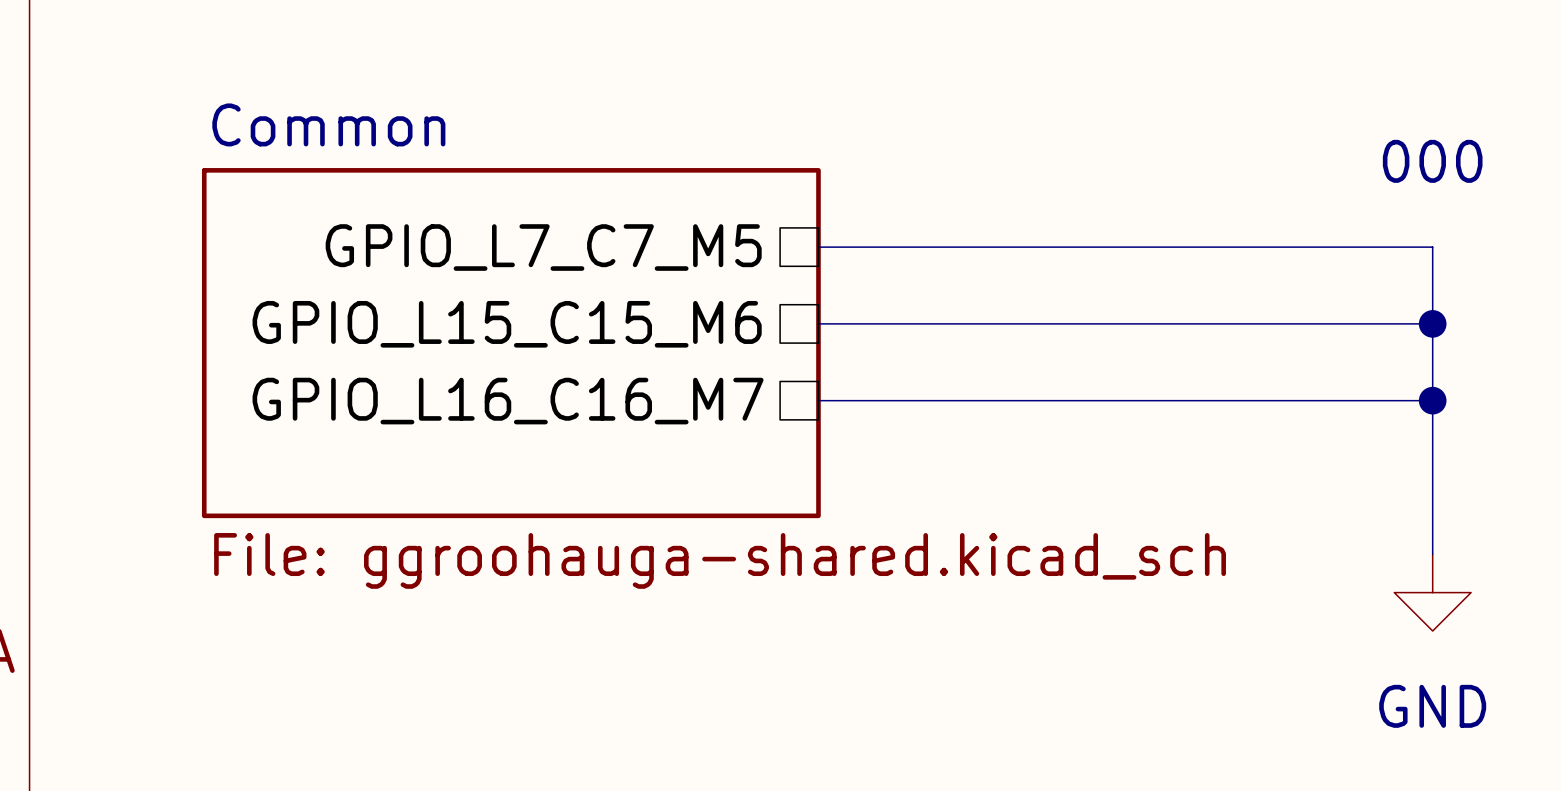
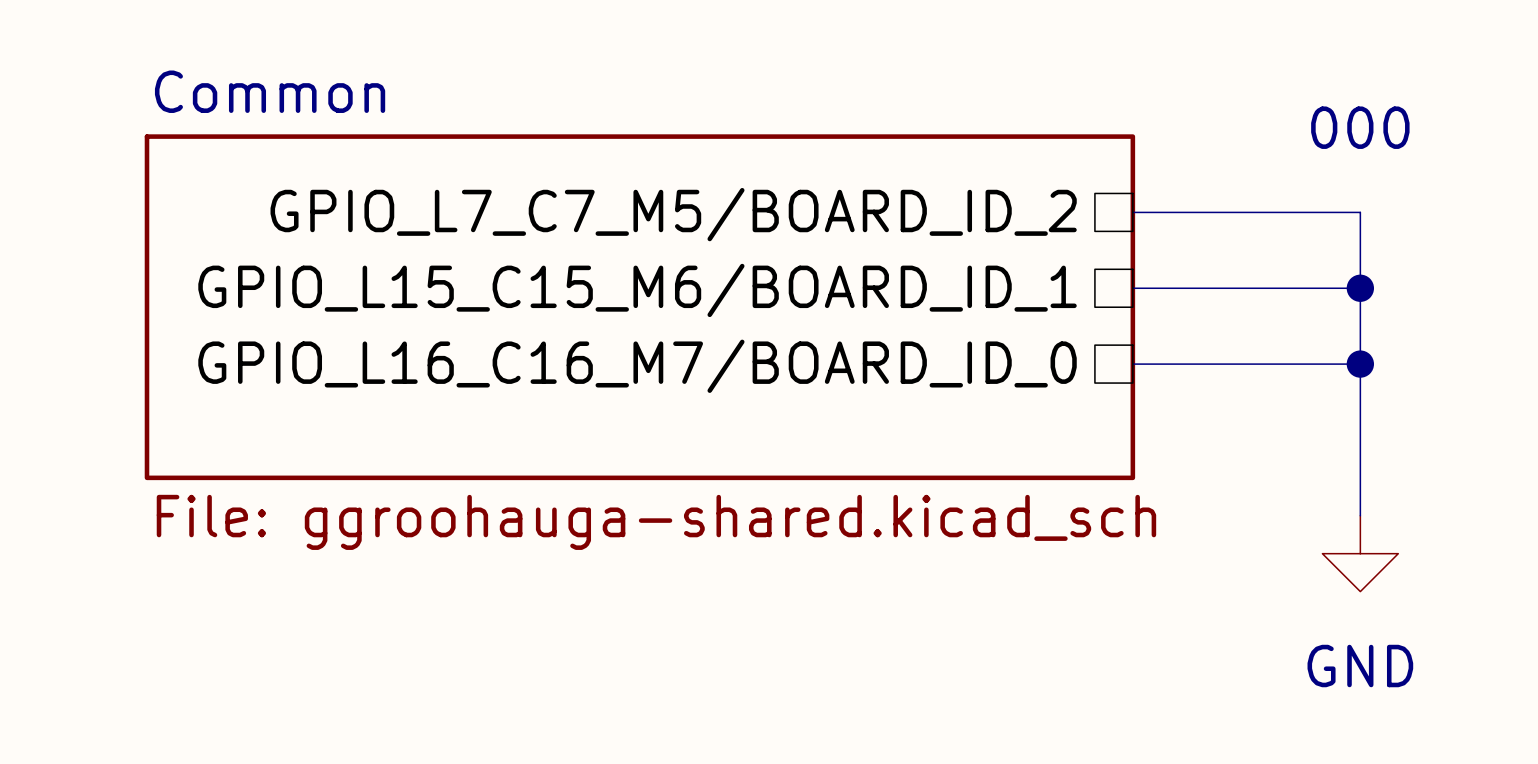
sheet pin: GPIO_L7_C7_M5 (543, 247) -> GPIO_L7_C7_M5/BOARD_ID_2 (673, 214)
wire: (818, 247) (1202, 247) -> none
wire: (818, 323) (1202, 323) -> none
sheet pin: GPIO_L15_C15_M6 (507, 324) -> GPIO_L15_C15_M6/BOARD_ID_1 (637, 290)
sheet Common: File: ggroohauga-shared.kicad_sch (511, 343) -> none
sheet Common: none -> File: ggroohauga-shared.kicad_sch (639, 307)
wire: (818, 400) (1202, 400) -> none
sheet pin: GPIO_L16_C16_M7 (508, 401) -> GPIO_L16_C16_M7/BOARD_ID_0 (637, 366)

